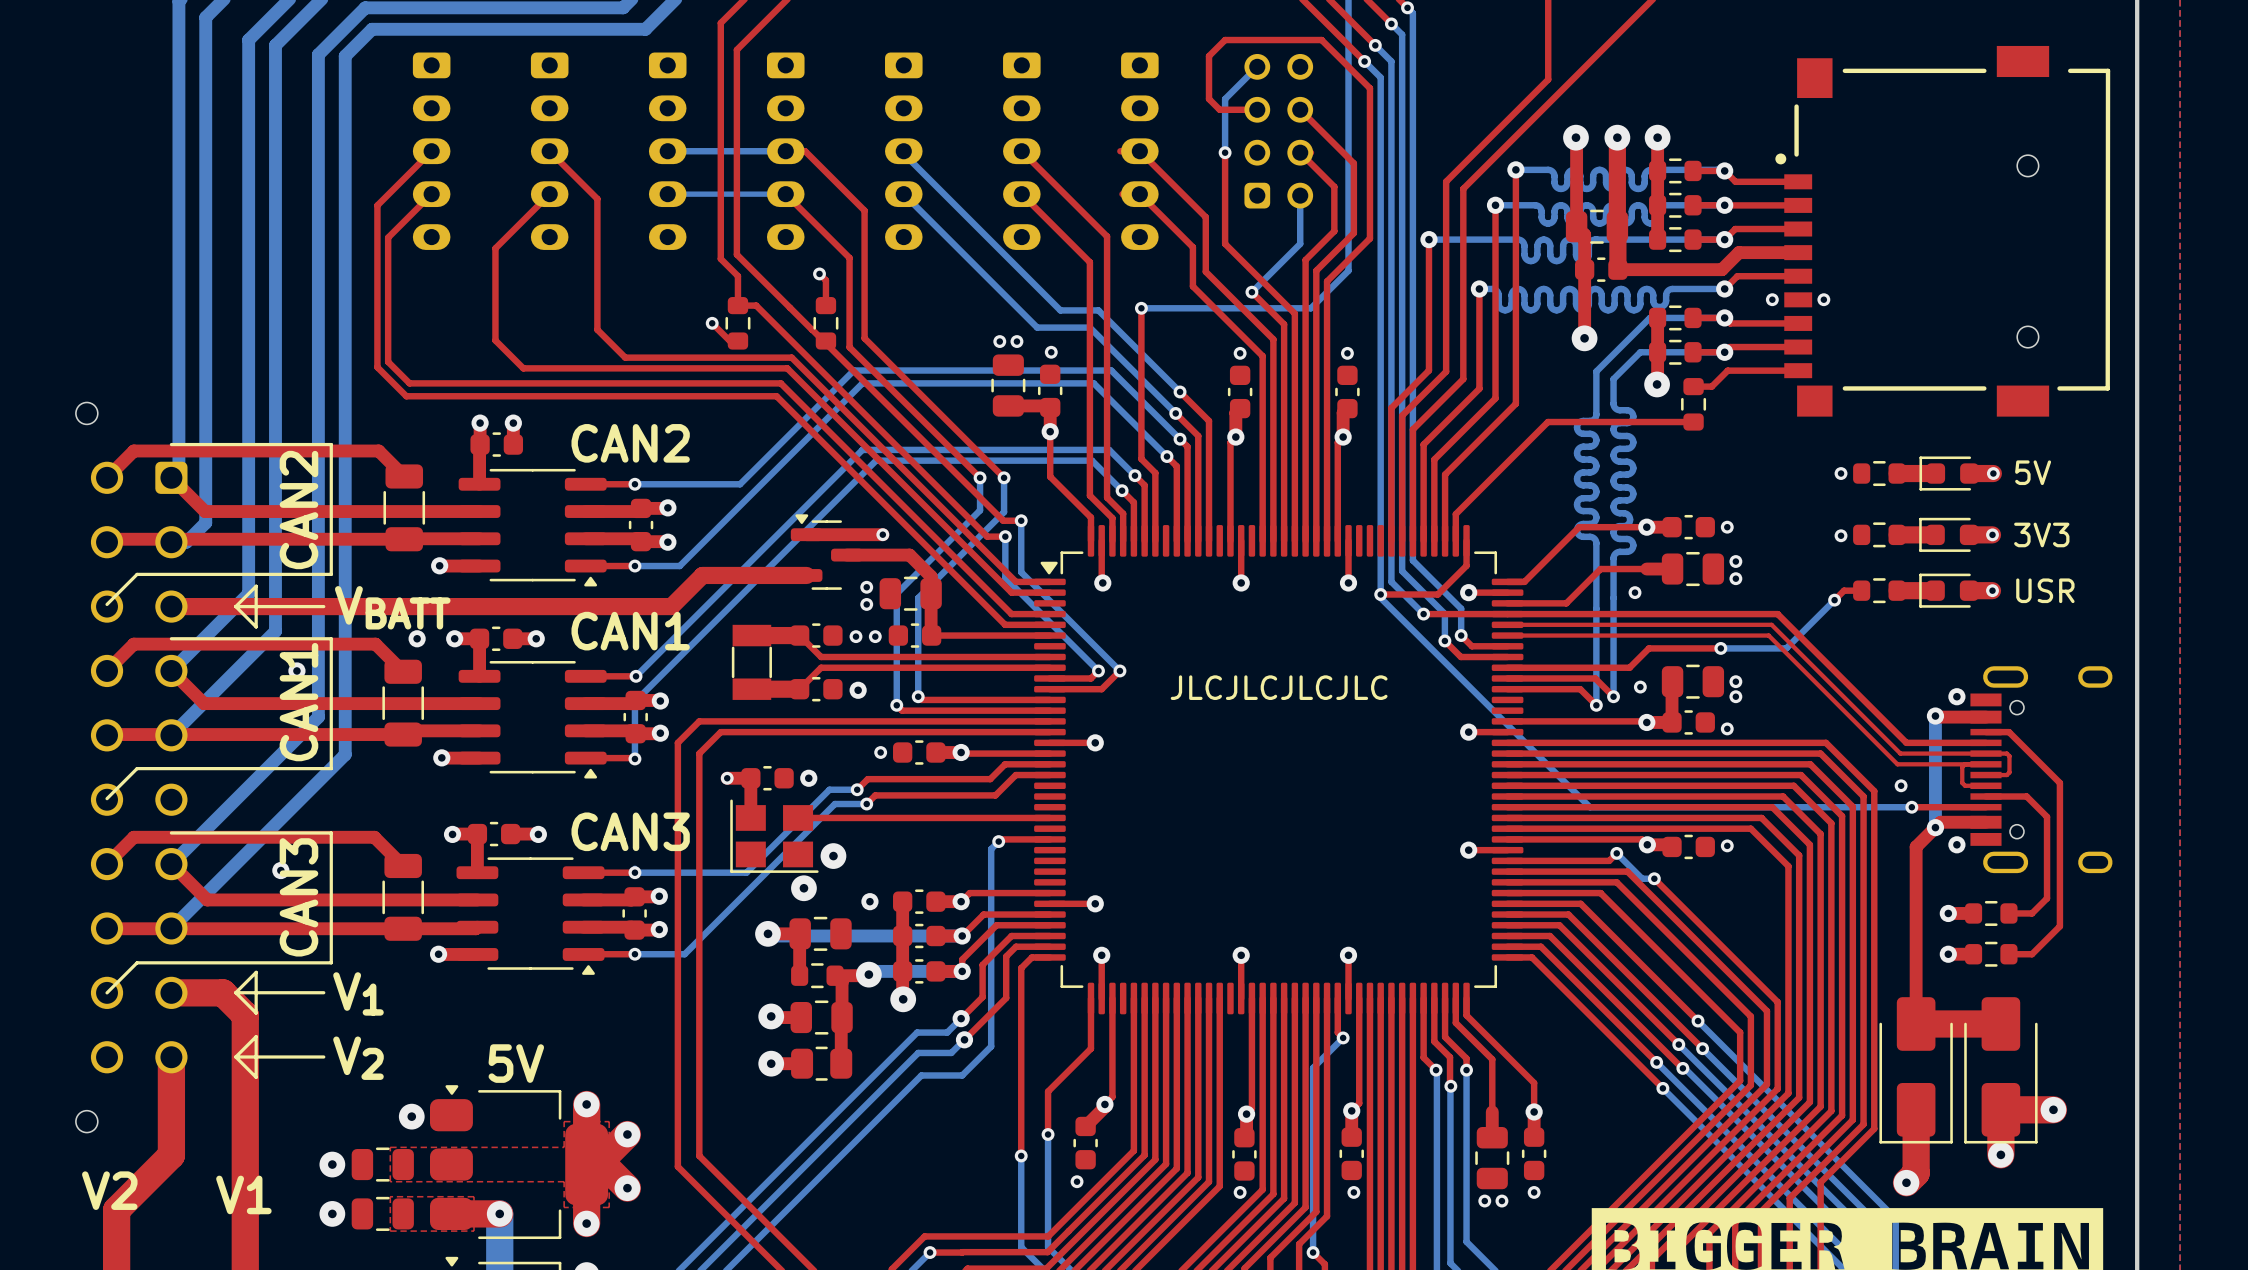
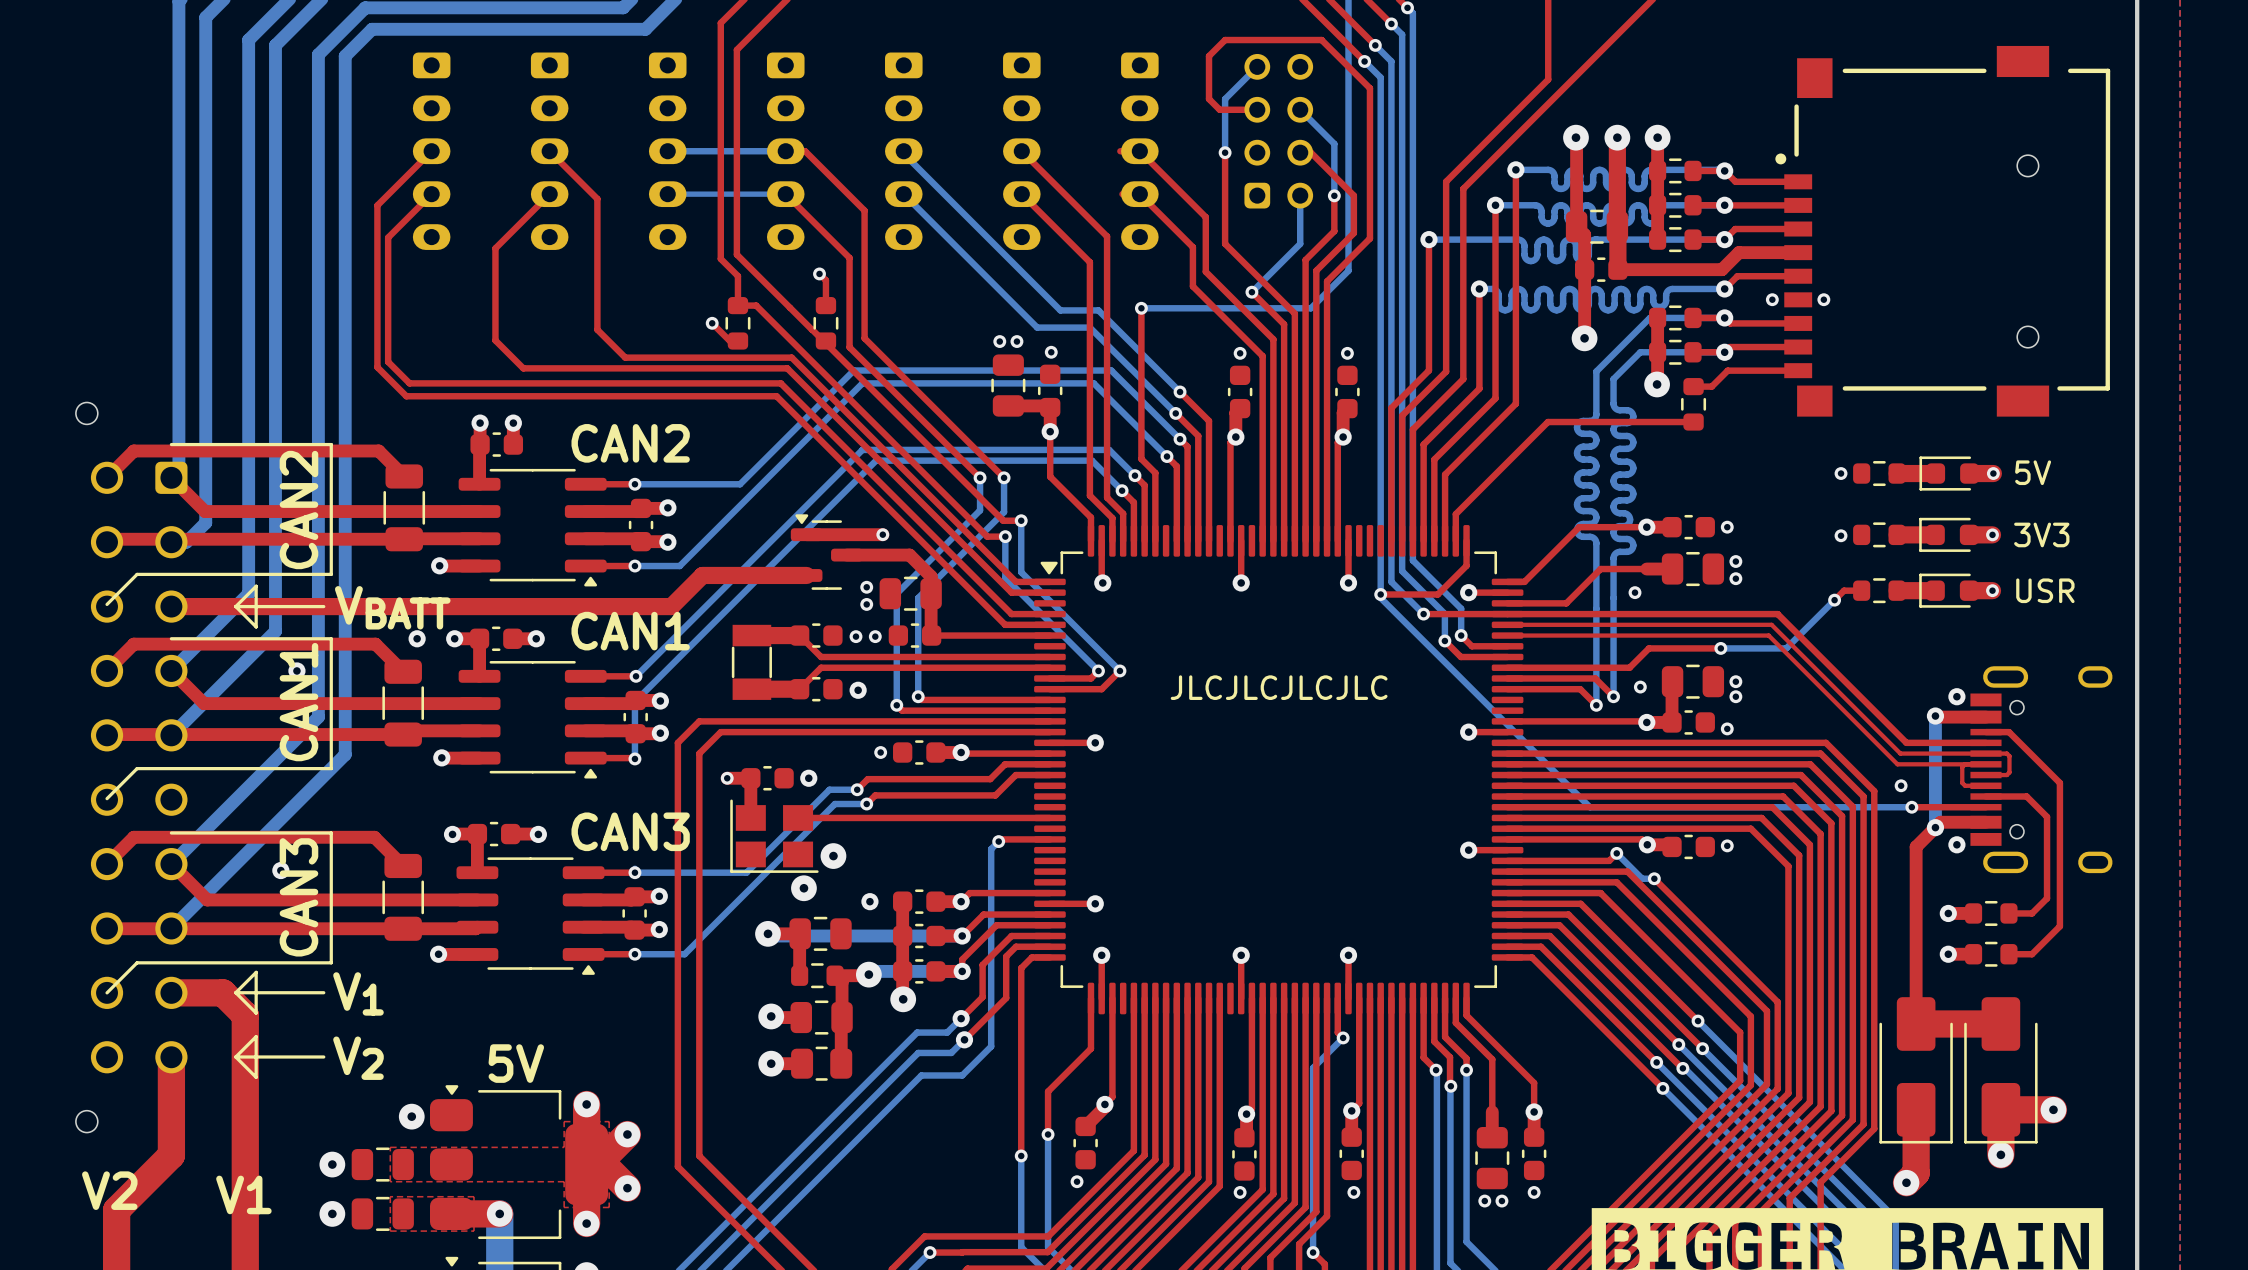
top track: (1300, 109) (1353, 163) (1353, 195) -> (1310, 152) (1353, 195)
bottom track: none -> (1300, 109) (1334, 143) (1334, 195)
top track: (1300, 152) (1334, 186) (1334, 195) -> none
via: none -> (1334, 195)

